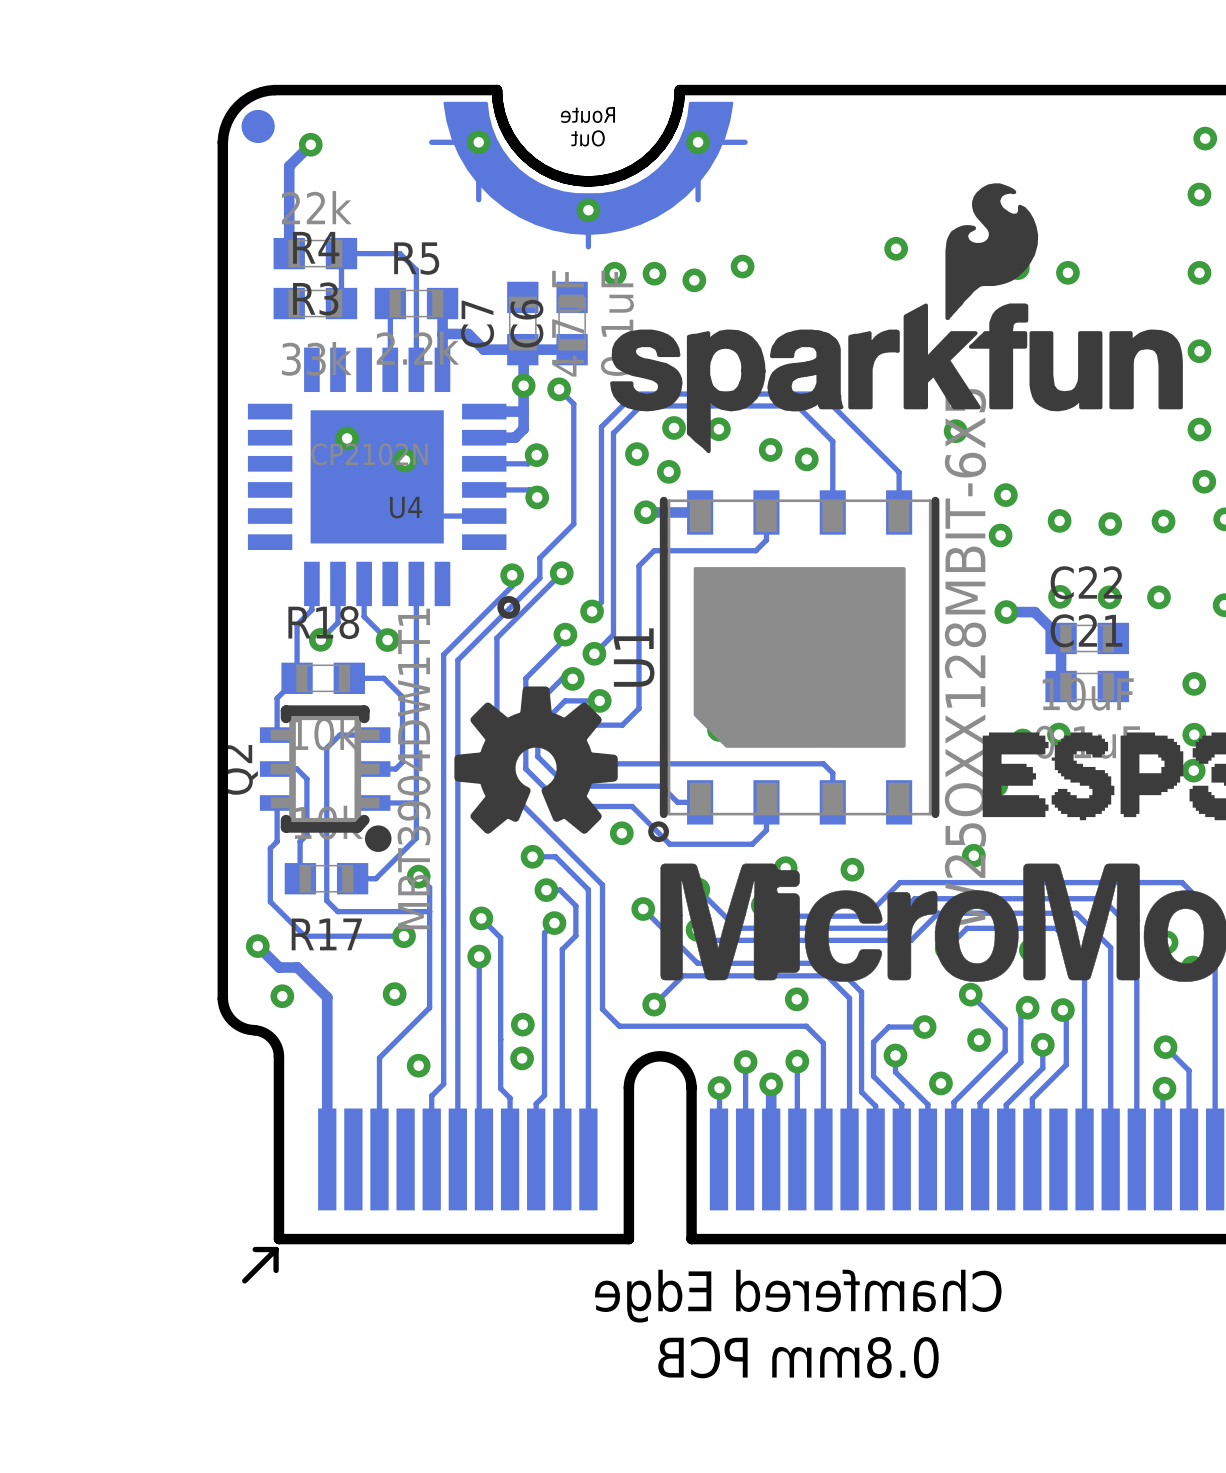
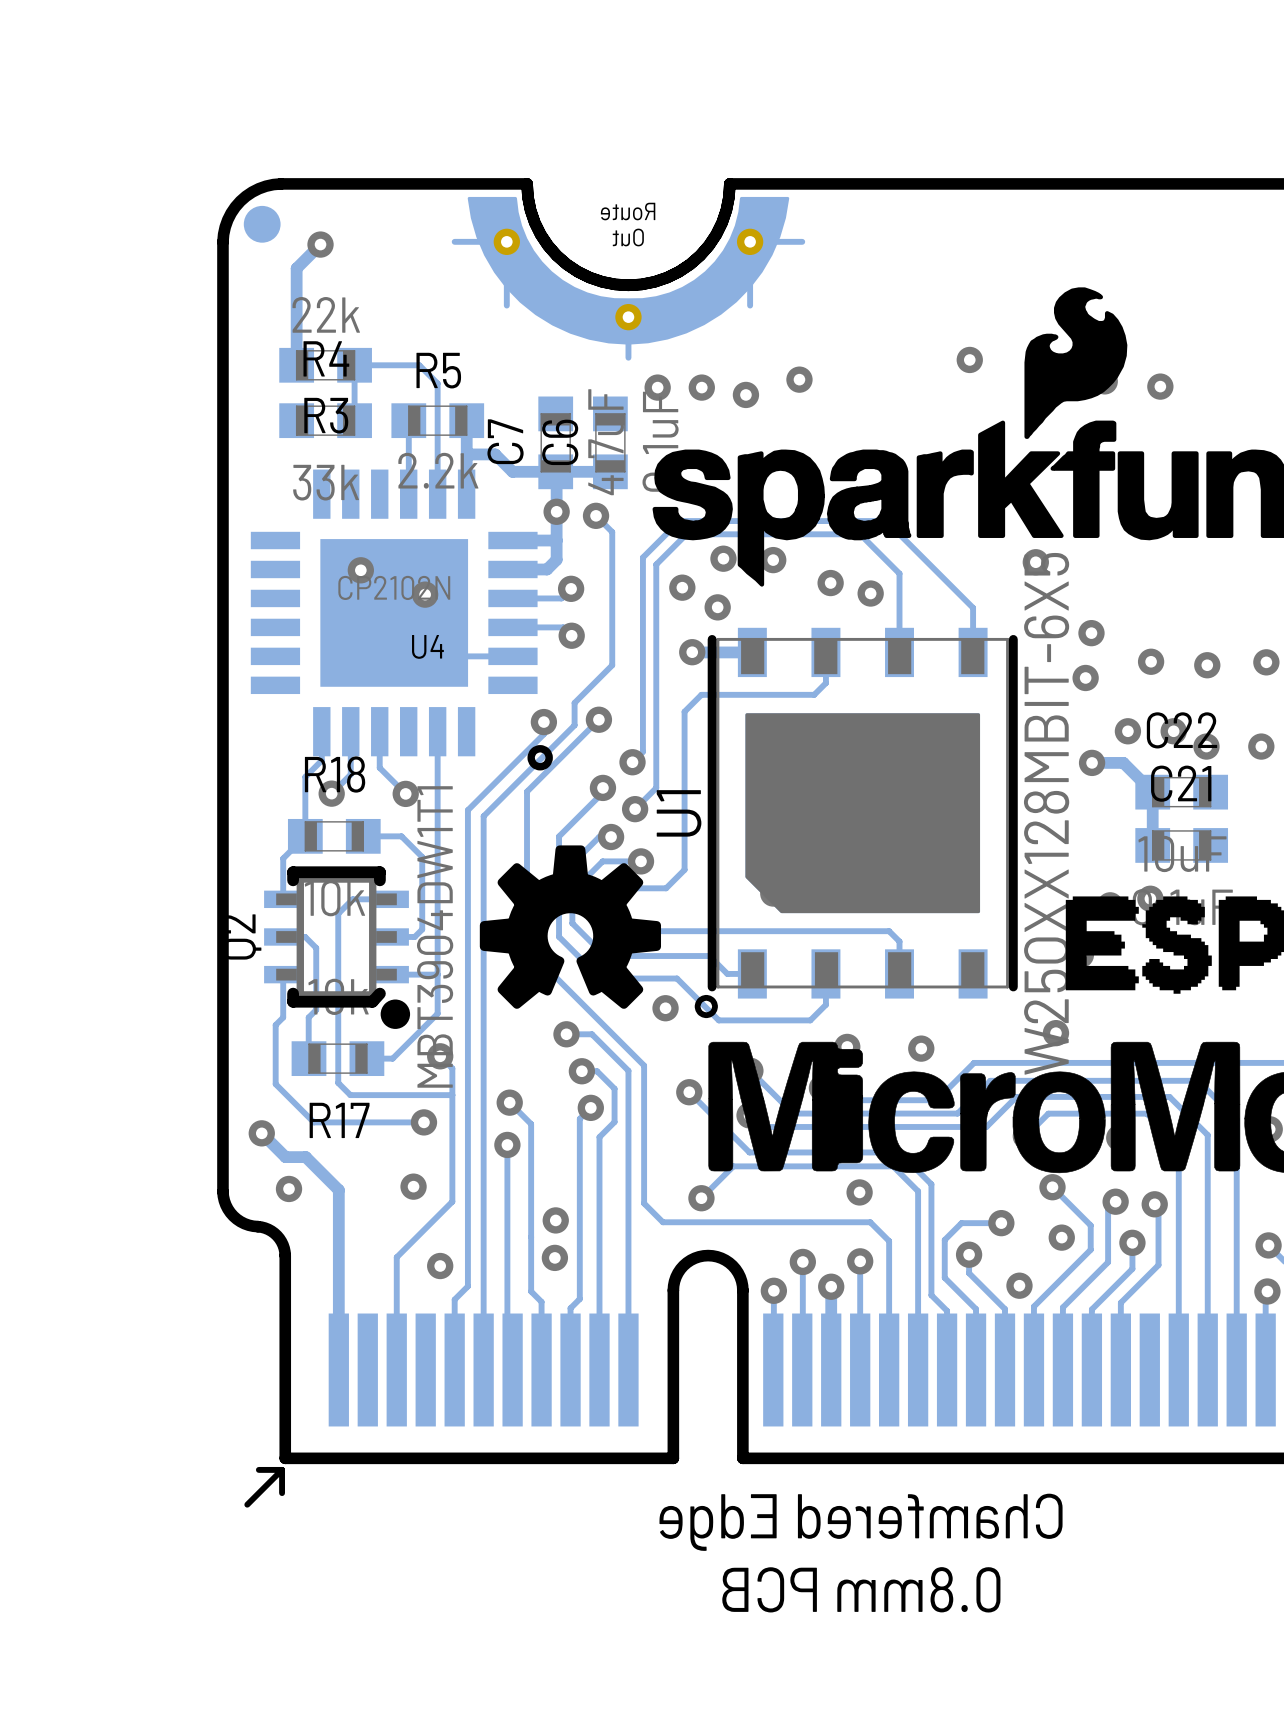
via: none -> (1127, 731)
via: none -> (1173, 731)
via: (1060, 596) -> none

